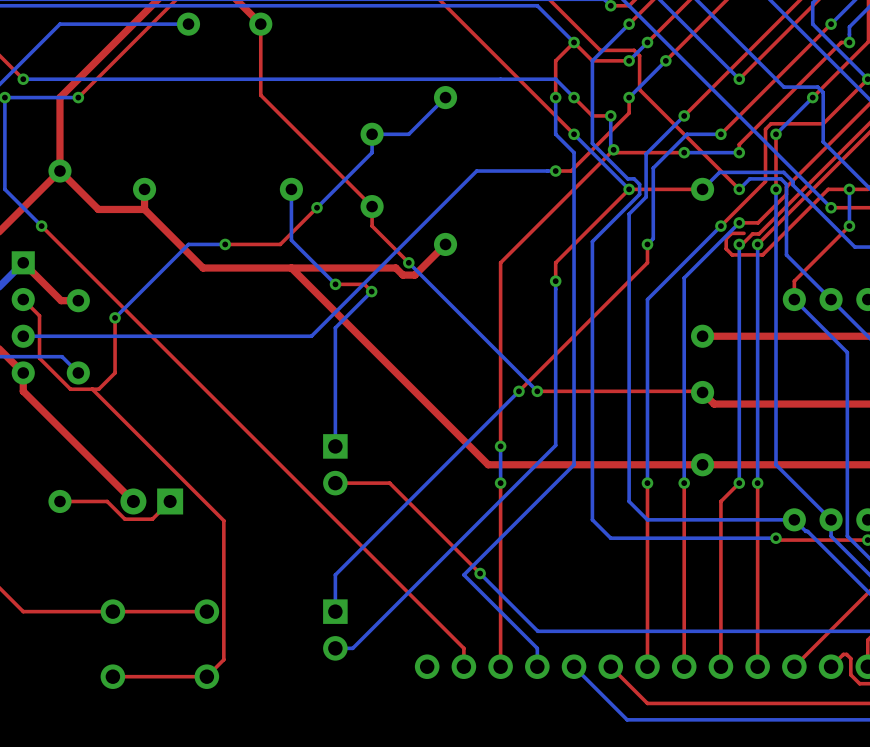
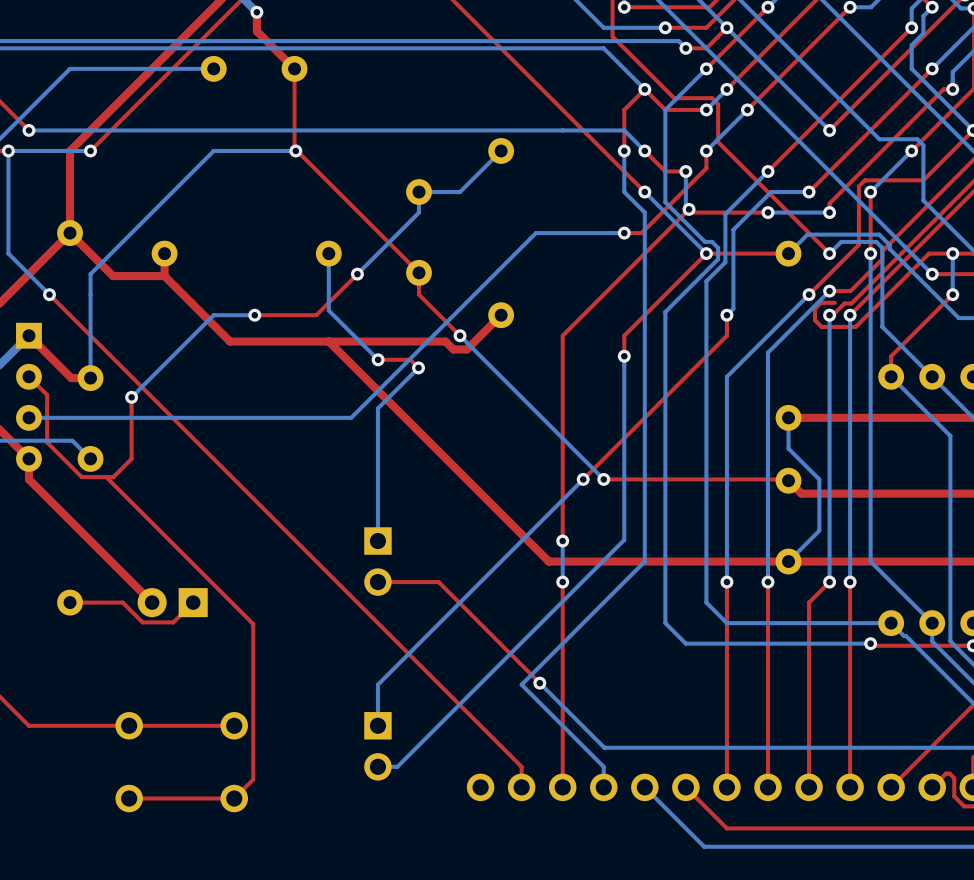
bottom track: none -> (295, 150) (213, 150) (90, 274) (90, 378)
via: none -> (295, 150)
bottom track: none -> (788, 417) (788, 448) (819, 479) (819, 530) (788, 561)

